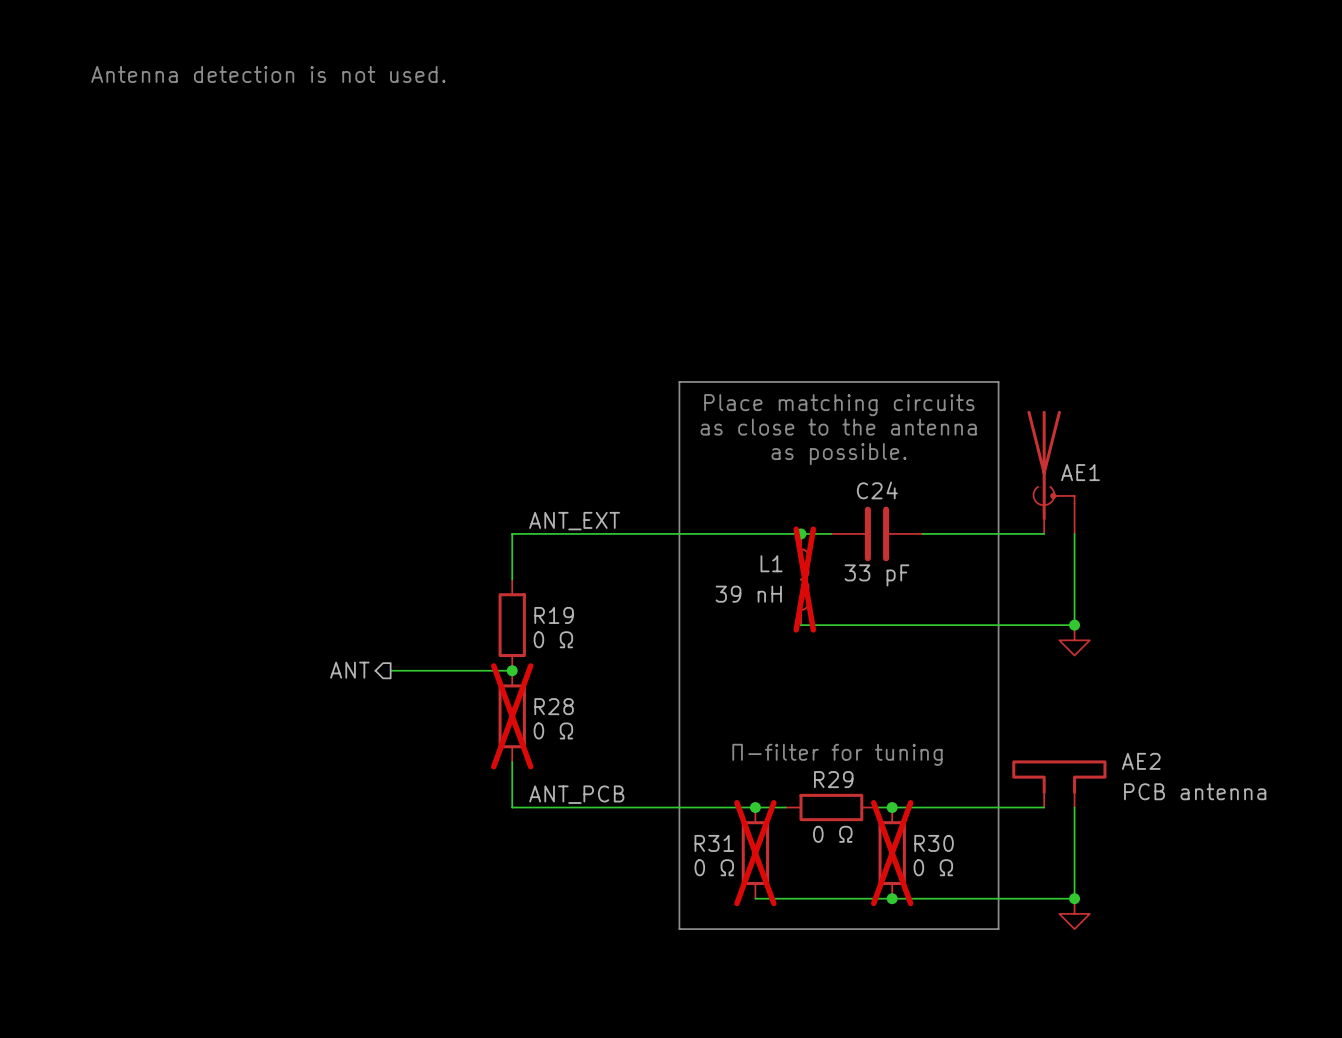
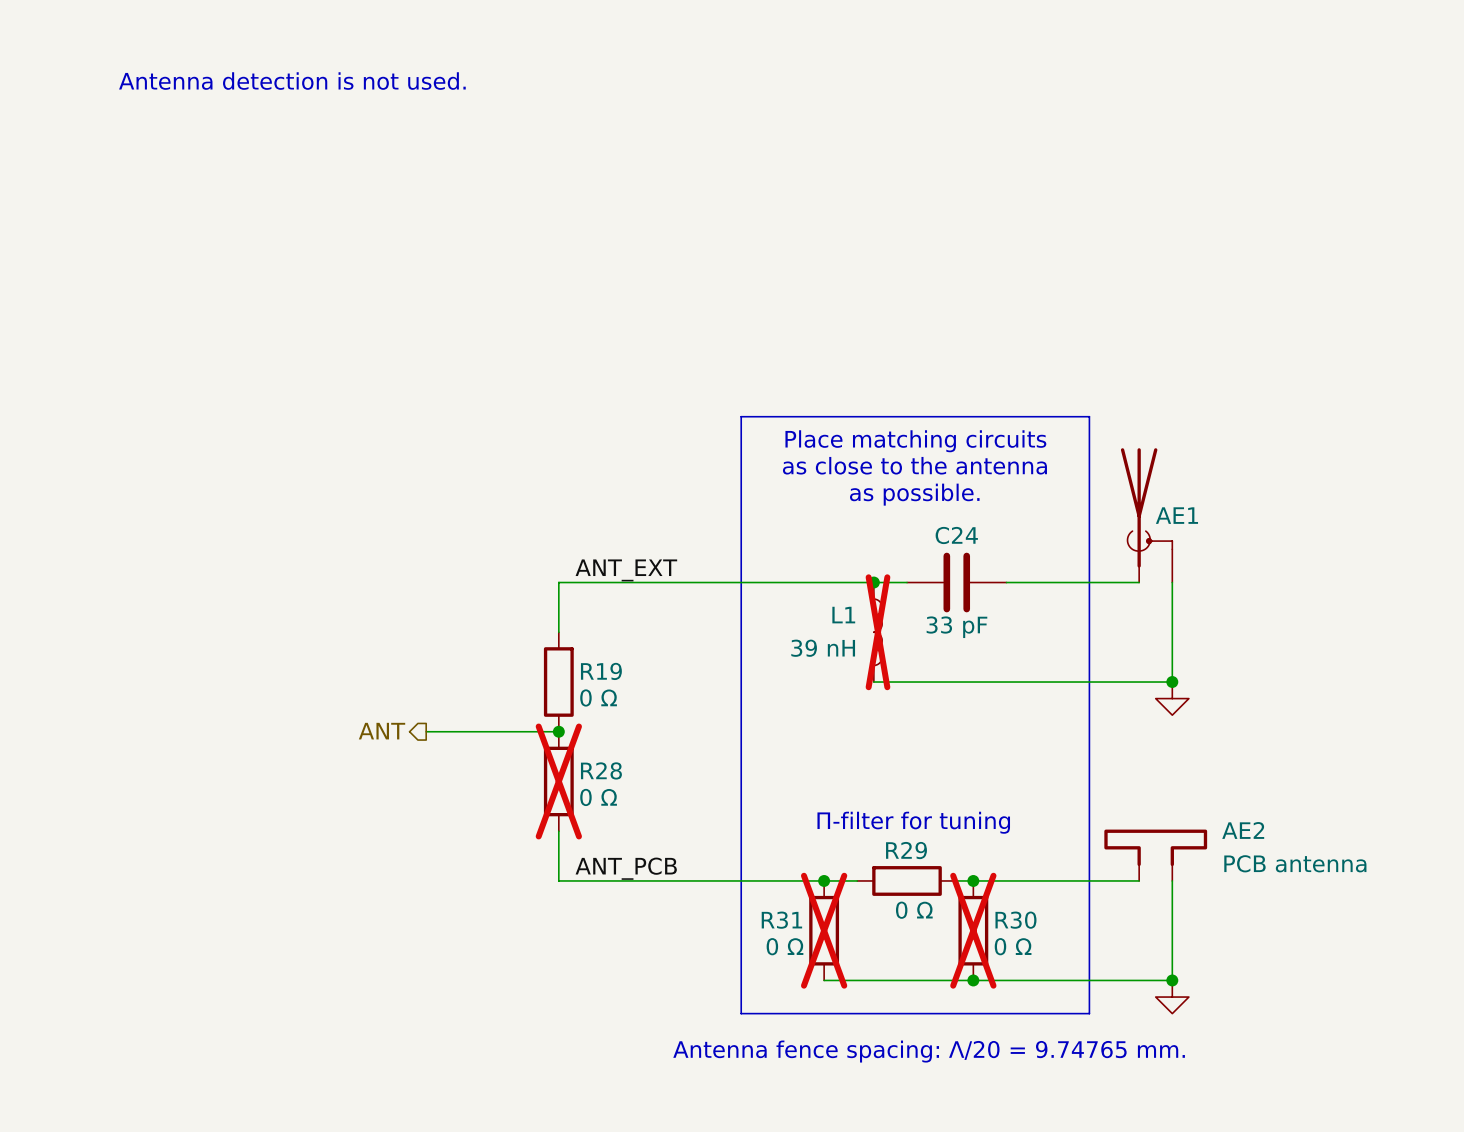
text: none -> Antenna fence spacing: Λ/20 = 9.74765 mm. (929, 1051)

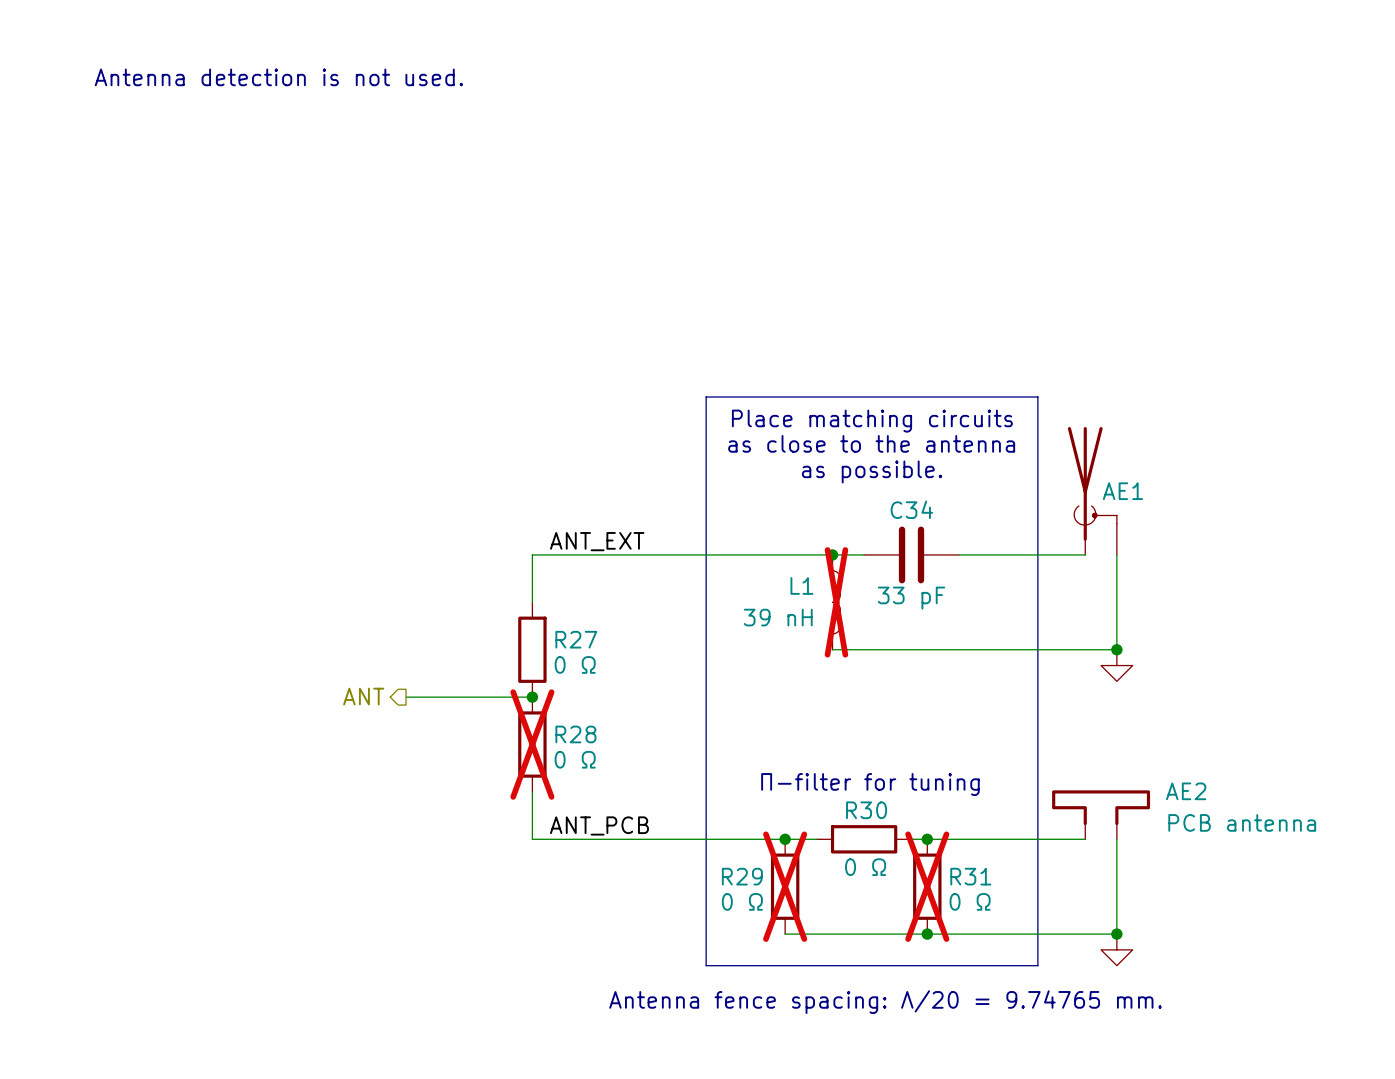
C24 name: C24 (956, 535) -> C34 (911, 509)
R19 name: R19 (601, 671) -> R27 (576, 639)
R29 name: R29 (906, 850) -> R30 (866, 810)
R31 name: R31 (781, 920) -> R29 (742, 876)
R30 name: R30 (1015, 920) -> R31 (970, 876)

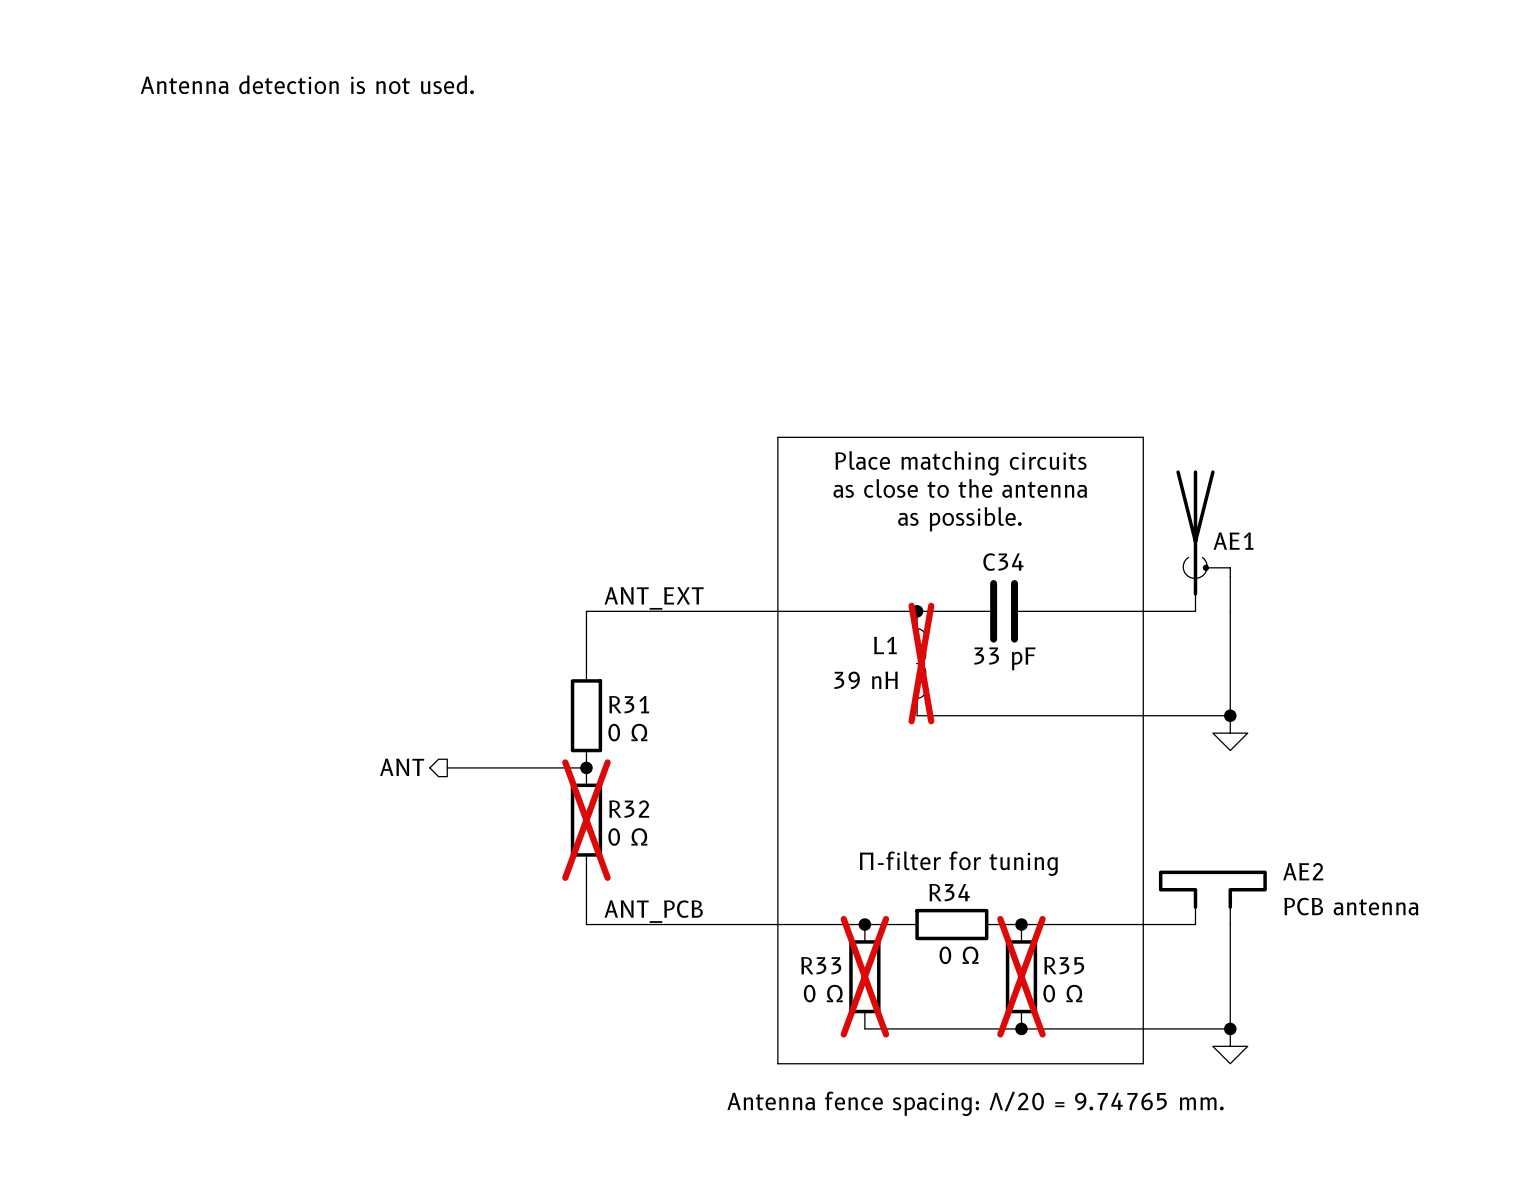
R27 name: R27 (576, 639) -> R31 (629, 704)
R28 name: R28 (575, 734) -> R32 (629, 809)
R30 name: R30 (866, 810) -> R34 (949, 892)
R29 name: R29 (742, 876) -> R33 (821, 965)
R31 name: R31 (970, 876) -> R35 (1064, 965)

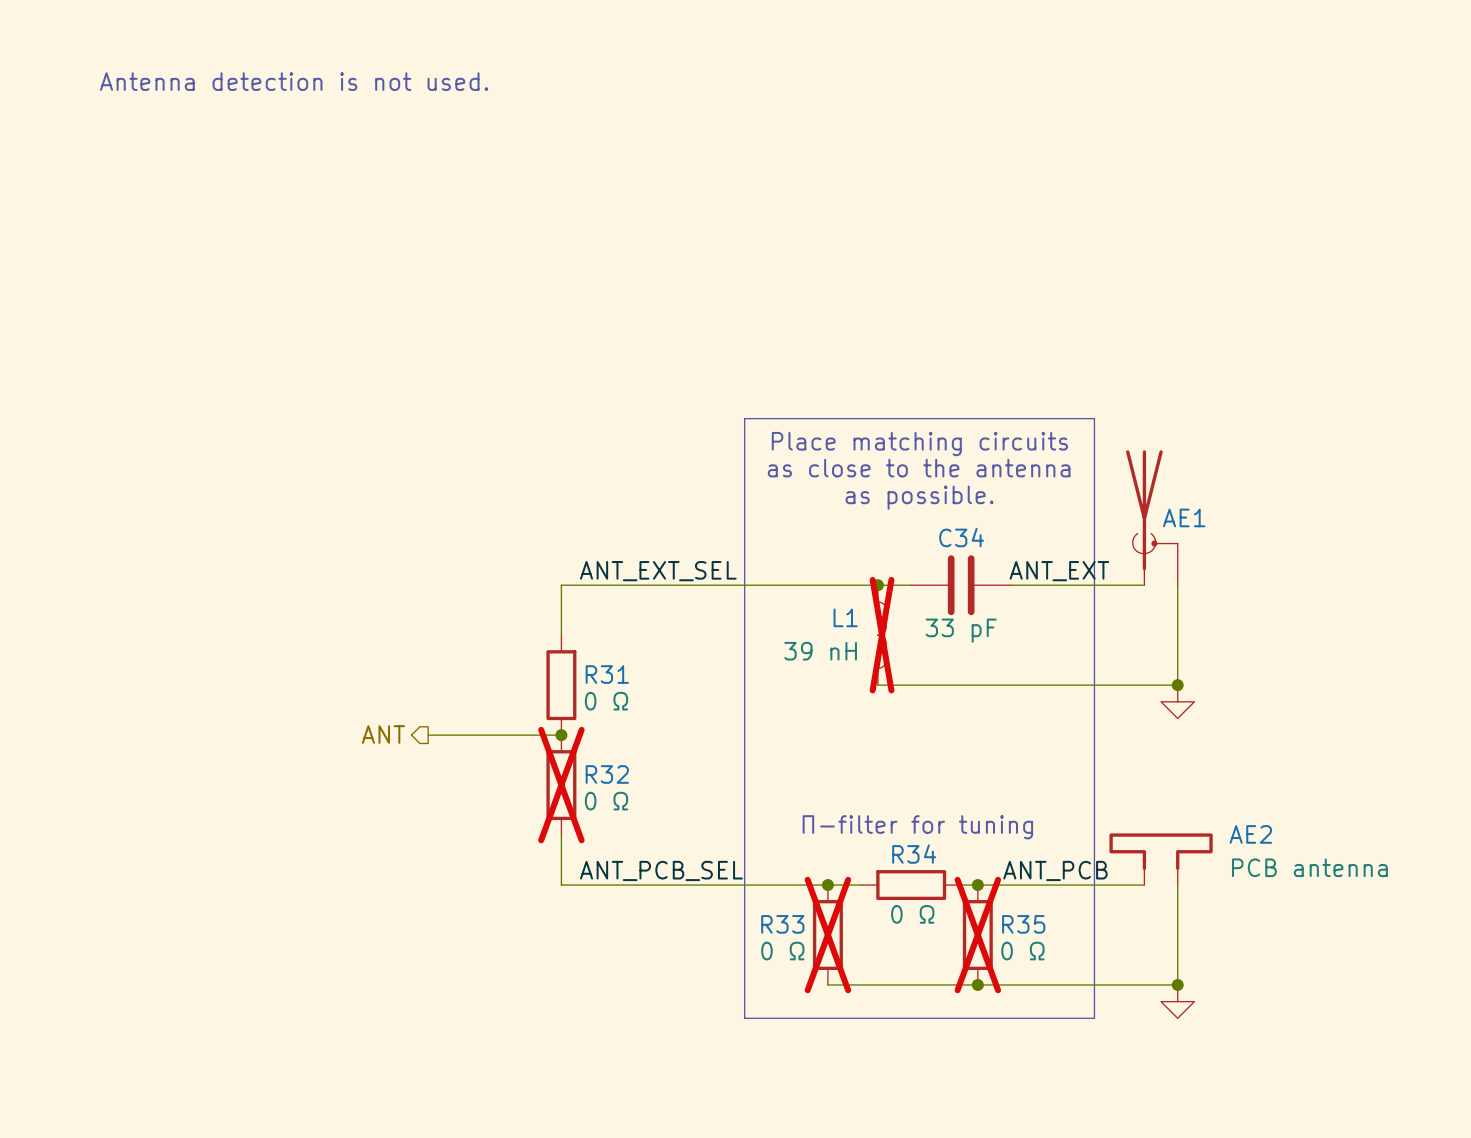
label: ANT_EXT (654, 598) -> ANT_EXT_SEL (658, 571)
label: none -> ANT_EXT (1059, 571)
label: ANT_PCB (653, 911) -> ANT_PCB_SEL (661, 870)
label: none -> ANT_PCB (1055, 870)
text: Antenna fence spacing: Λ/20 = 9.74765 mm. (975, 1103) -> none

